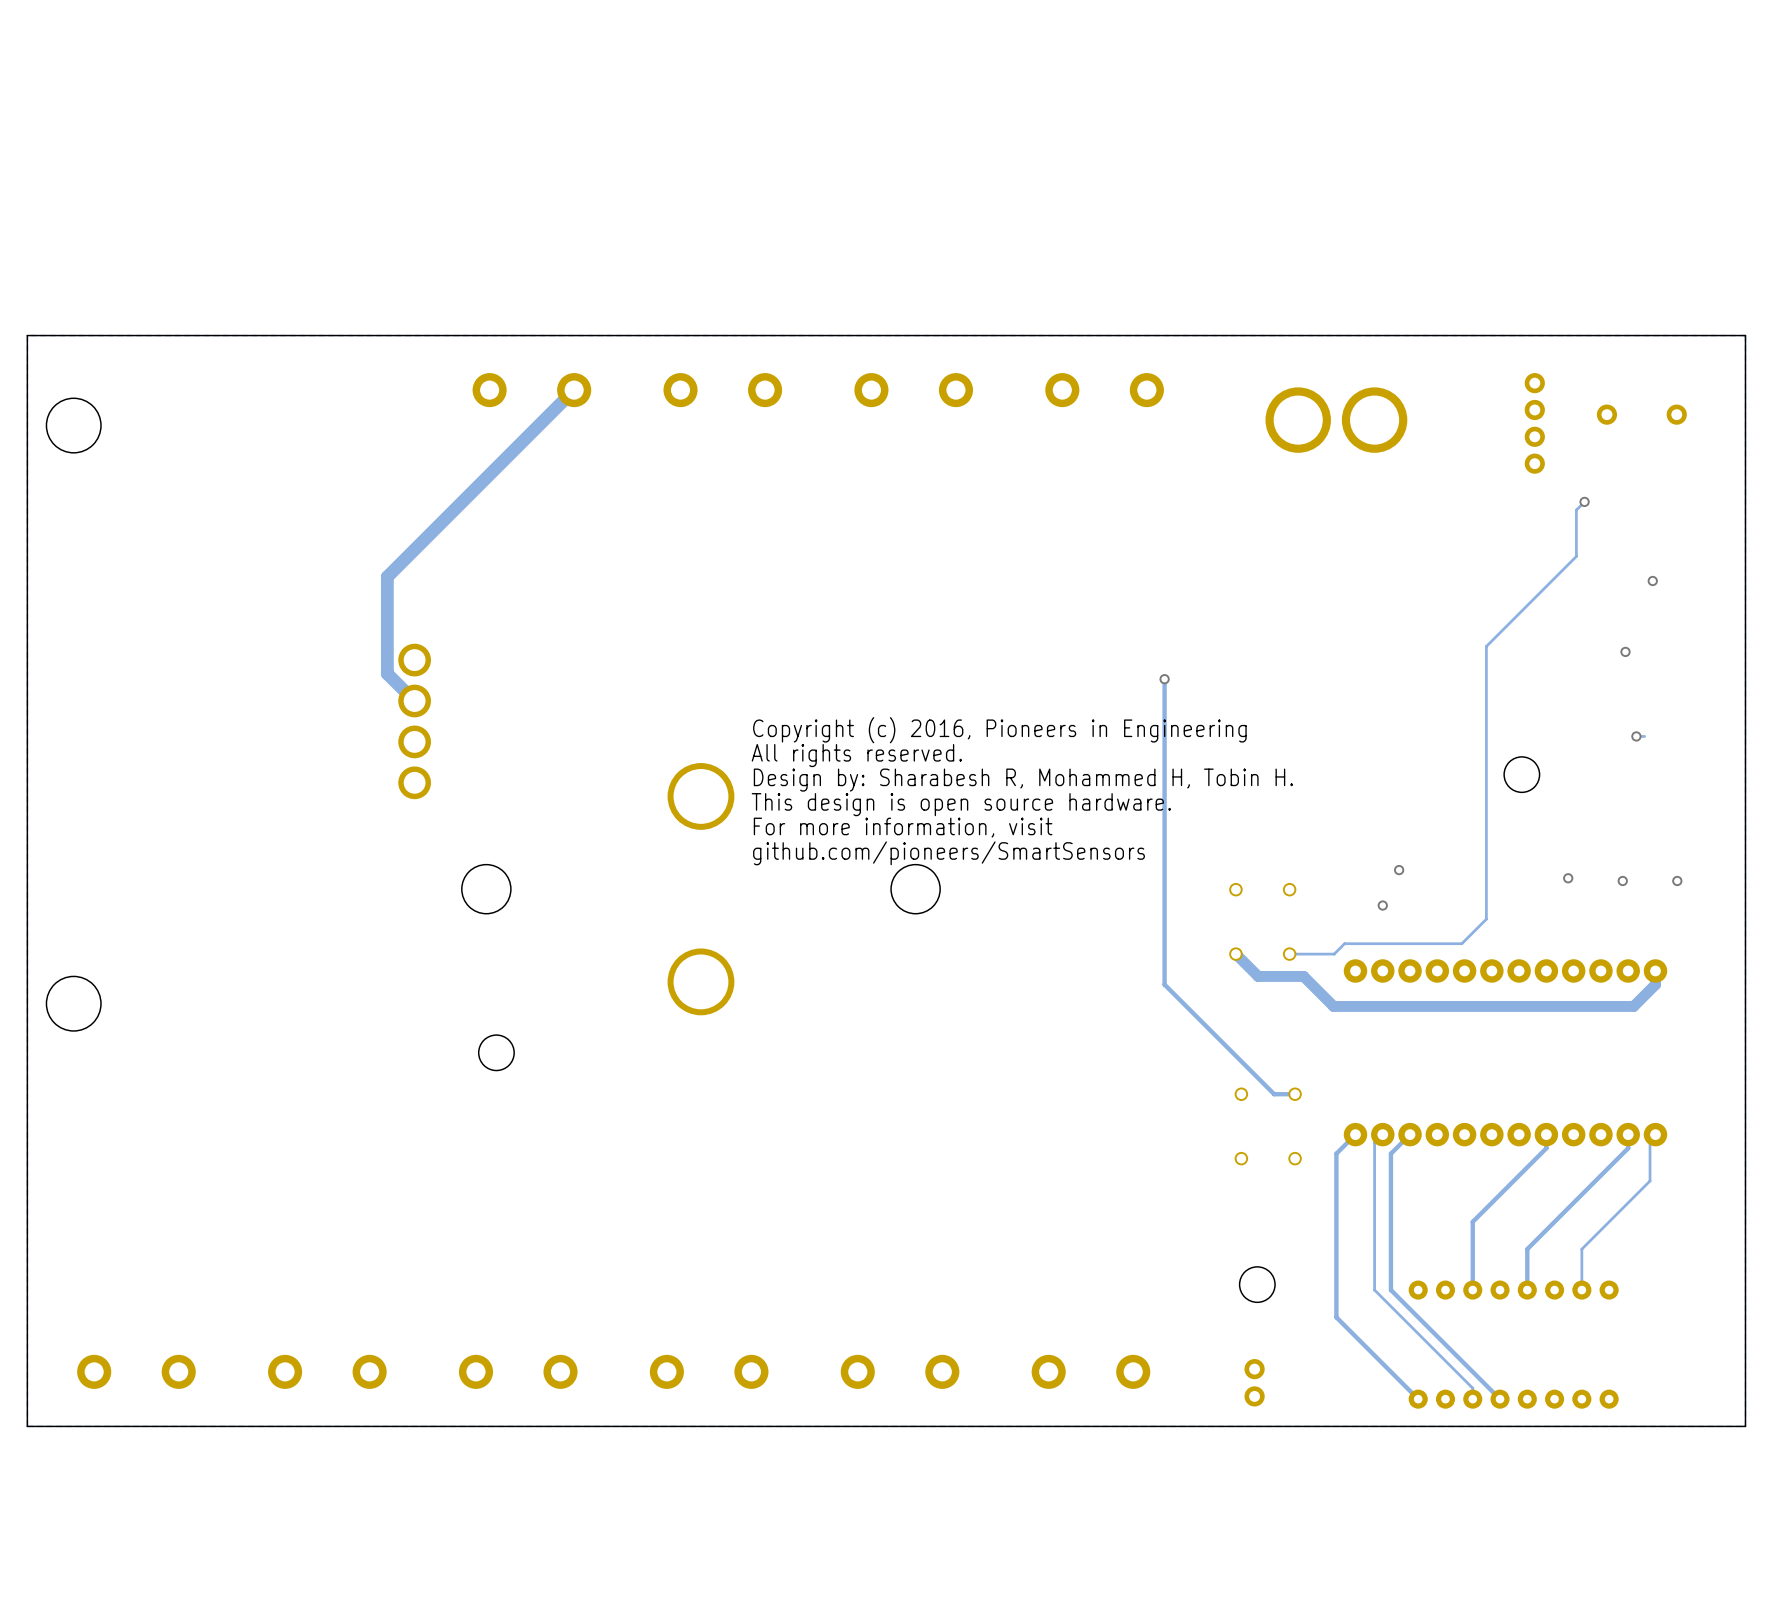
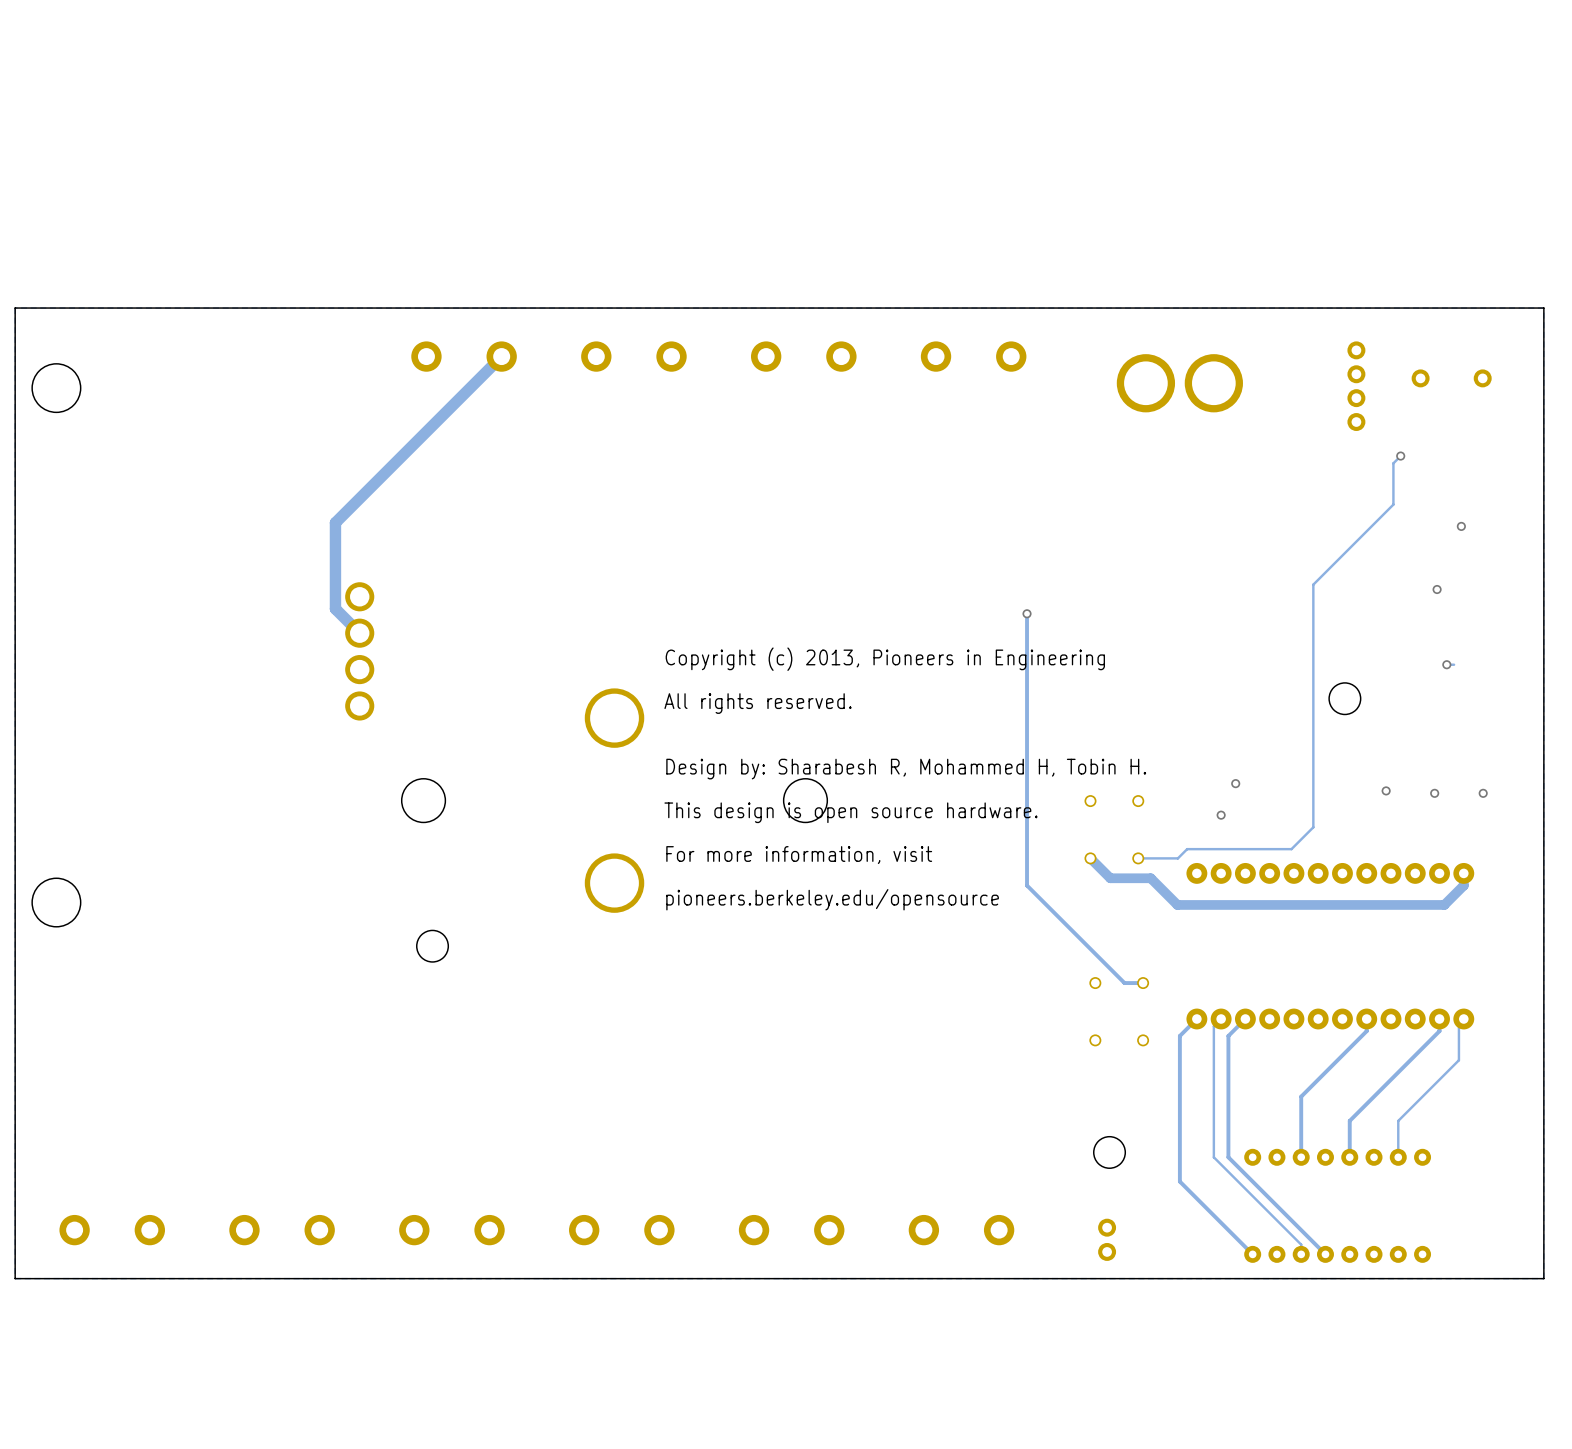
text: Copyright (c) 2016, Pioneers in Engineering (999, 730) -> Copyright (c) 2013, Pioneers in Engineering (885, 659)
text: All rights reserved. (856, 755) -> none
text: Design by: Sharabesh R, Mohammed H, Tobin H. (1023, 780) -> All rights reserved. (758, 703)
text position: This design is open source hardware. (961, 804) -> This design is open source hardware. (850, 812)
text position: For more information, visit (903, 827) -> For more information, visit (799, 855)
text: github.com/pioneers/SmartSensors (949, 853) -> Design by: Sharabesh R, Mohammed H, Tobin H. (906, 769)
text: none -> pioneers.berkeley.edu/opensource (832, 899)

